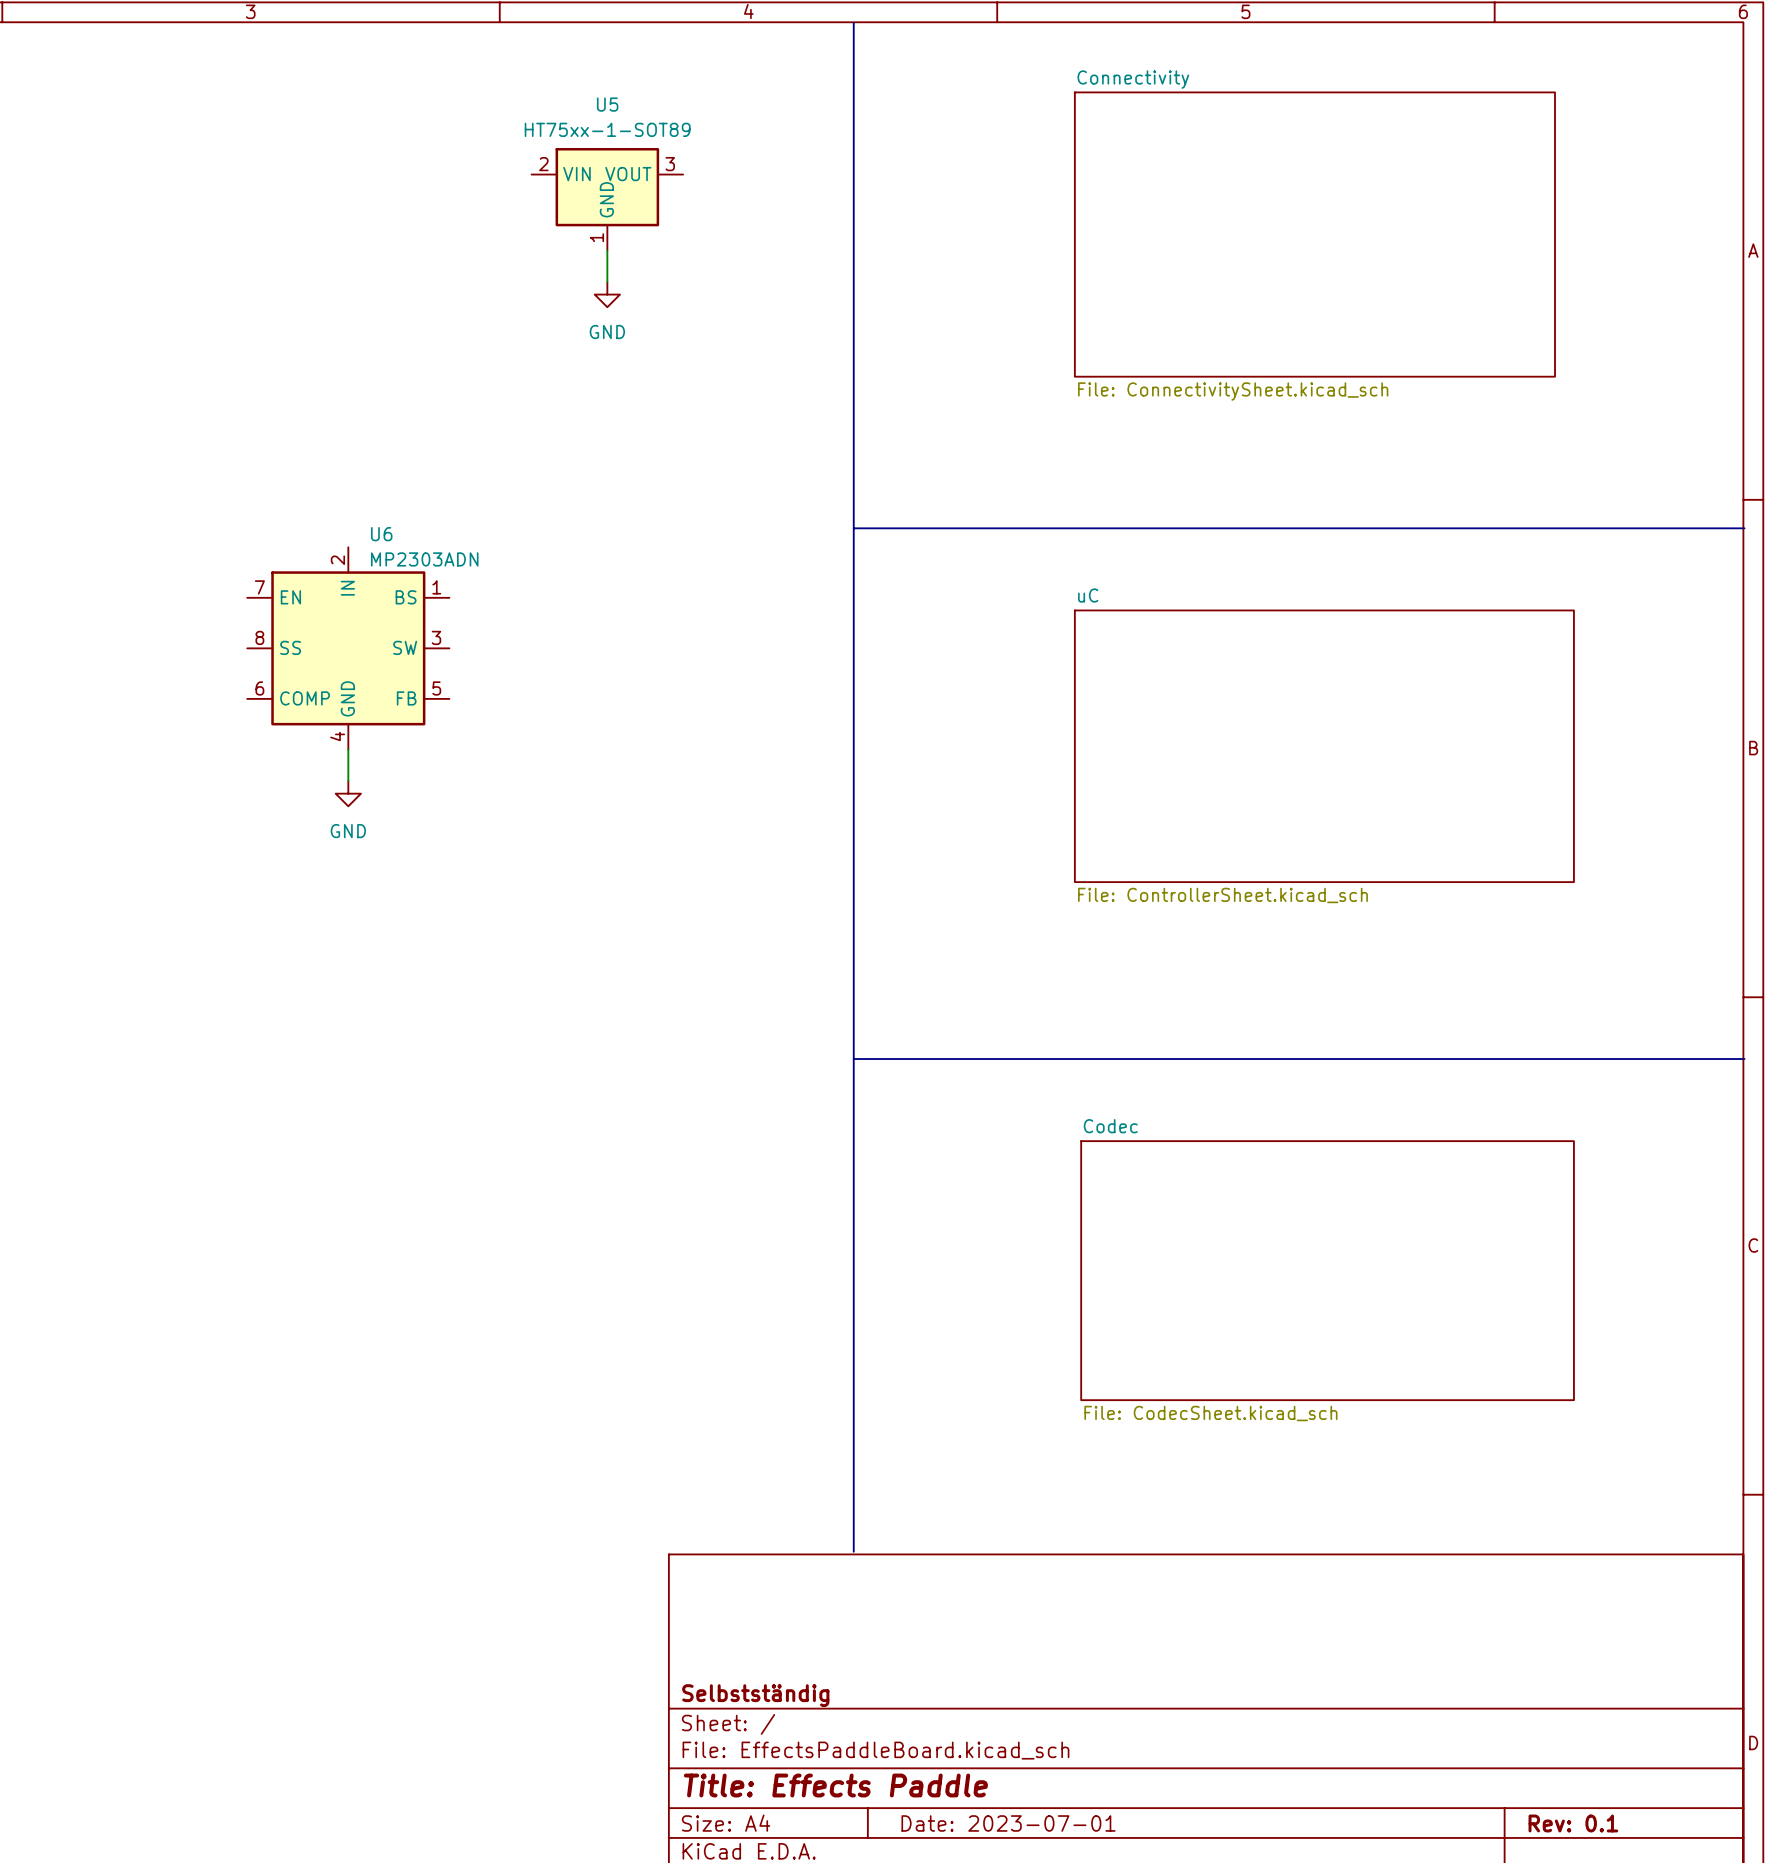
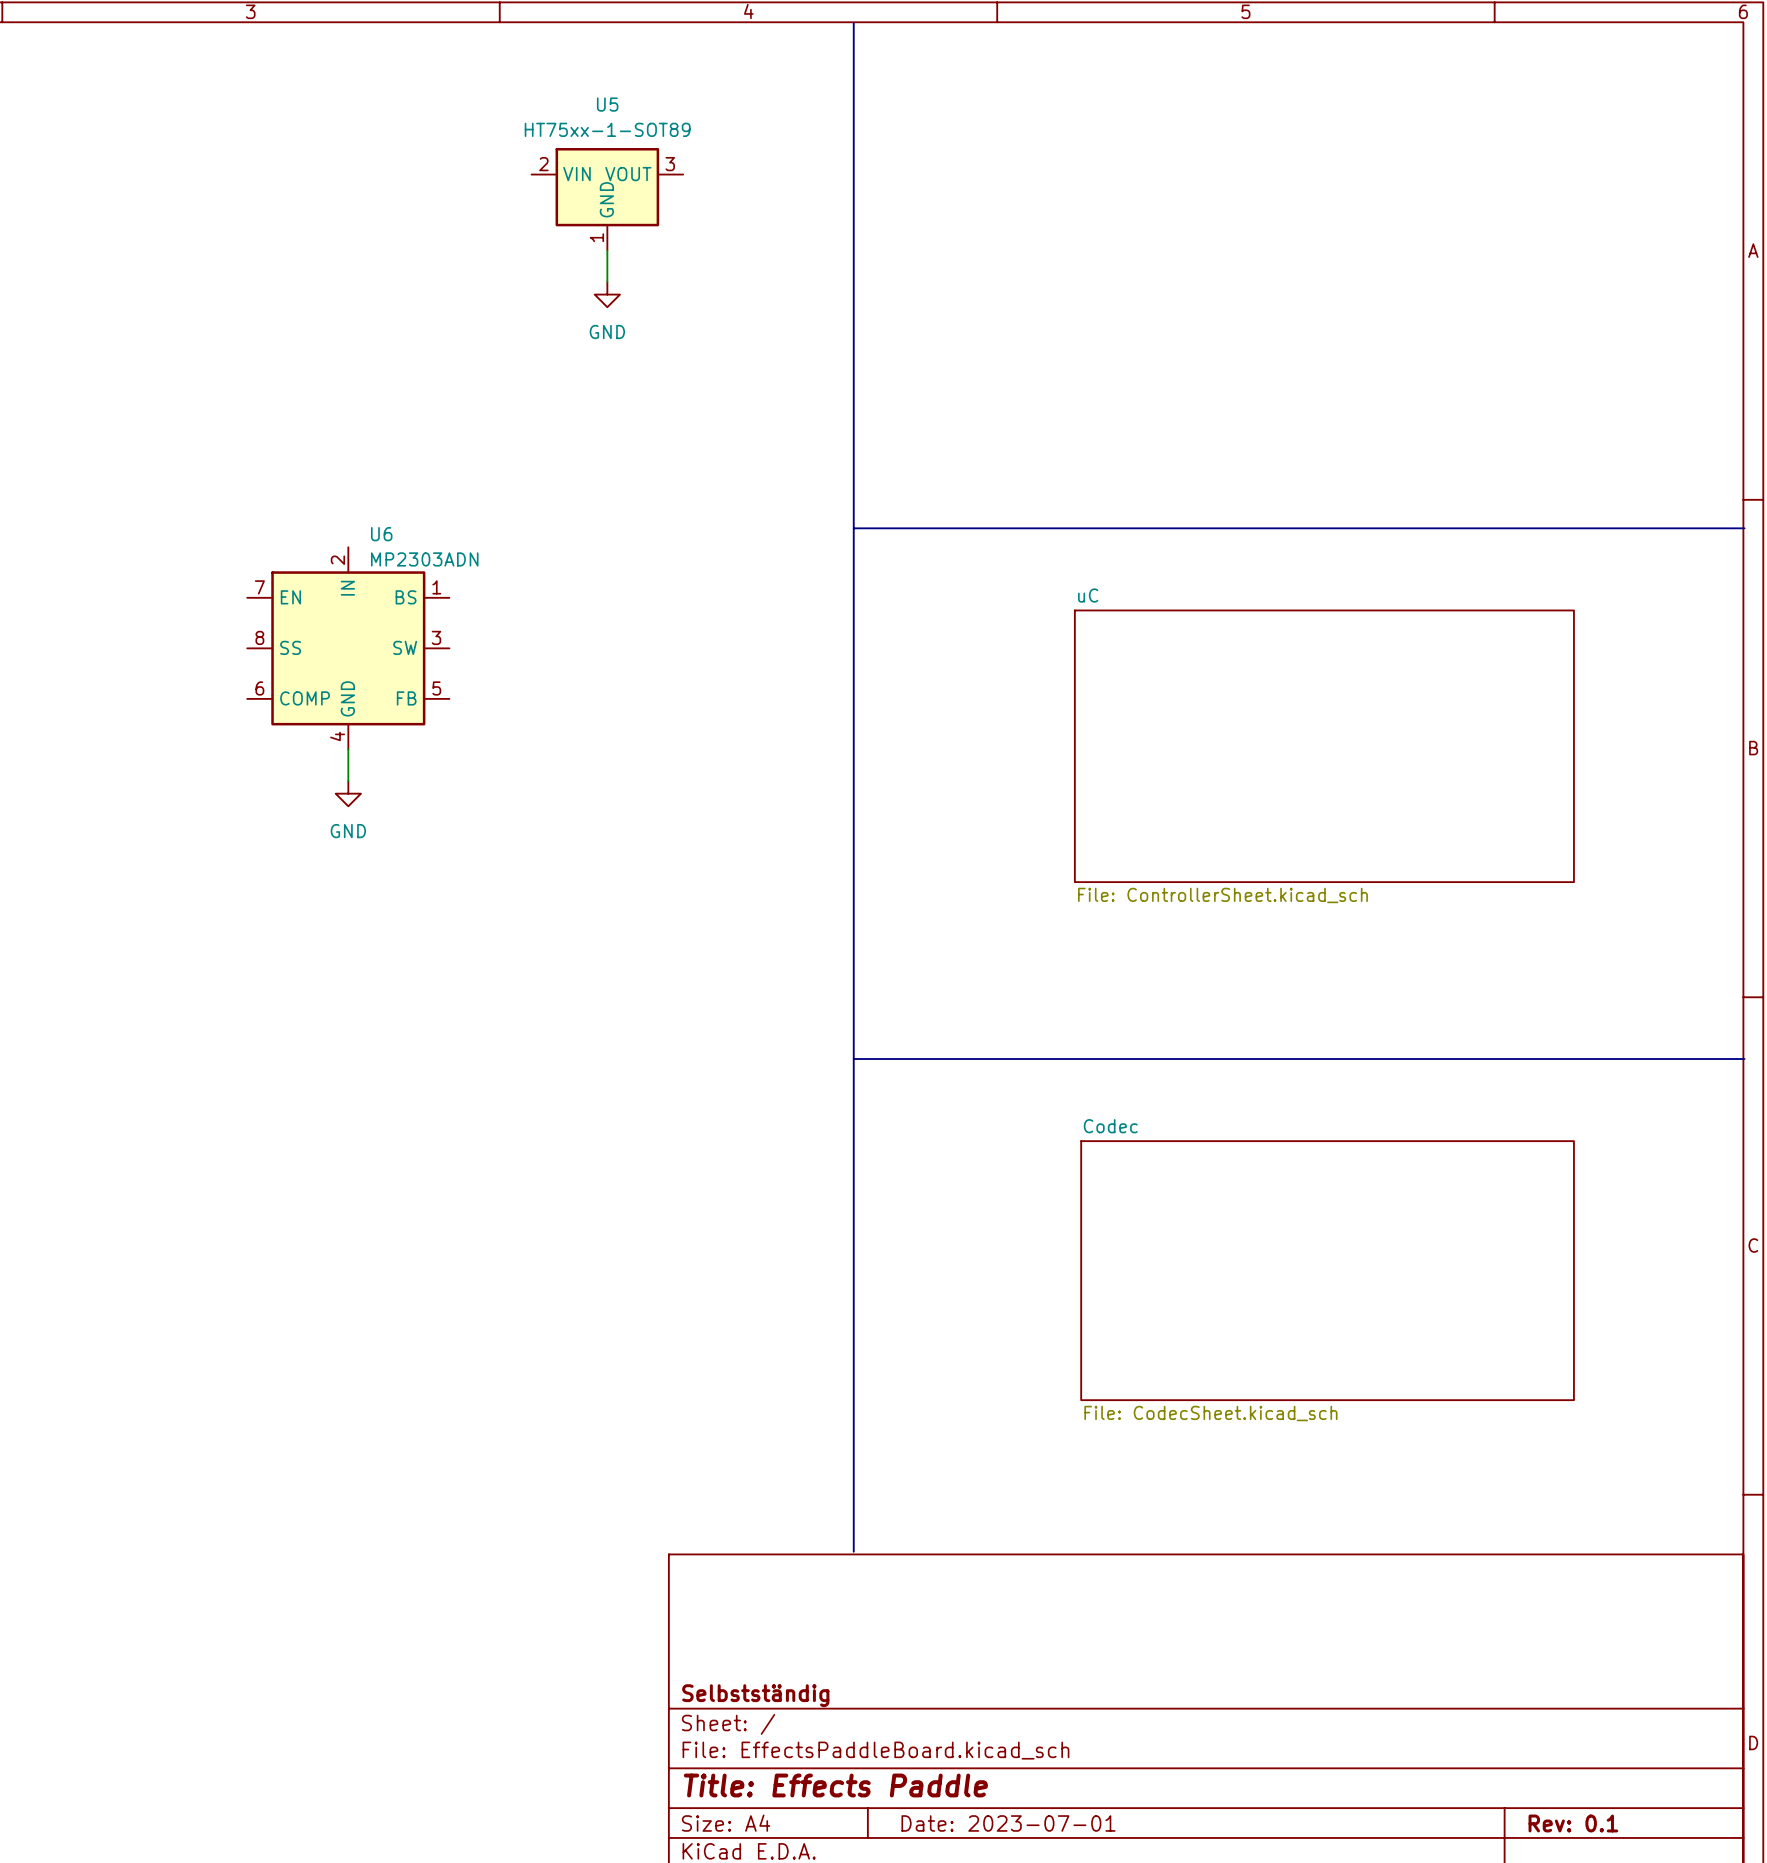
sheet Connectivity: File: ConnectivitySheet.kicad_sch (1314, 234) -> none

